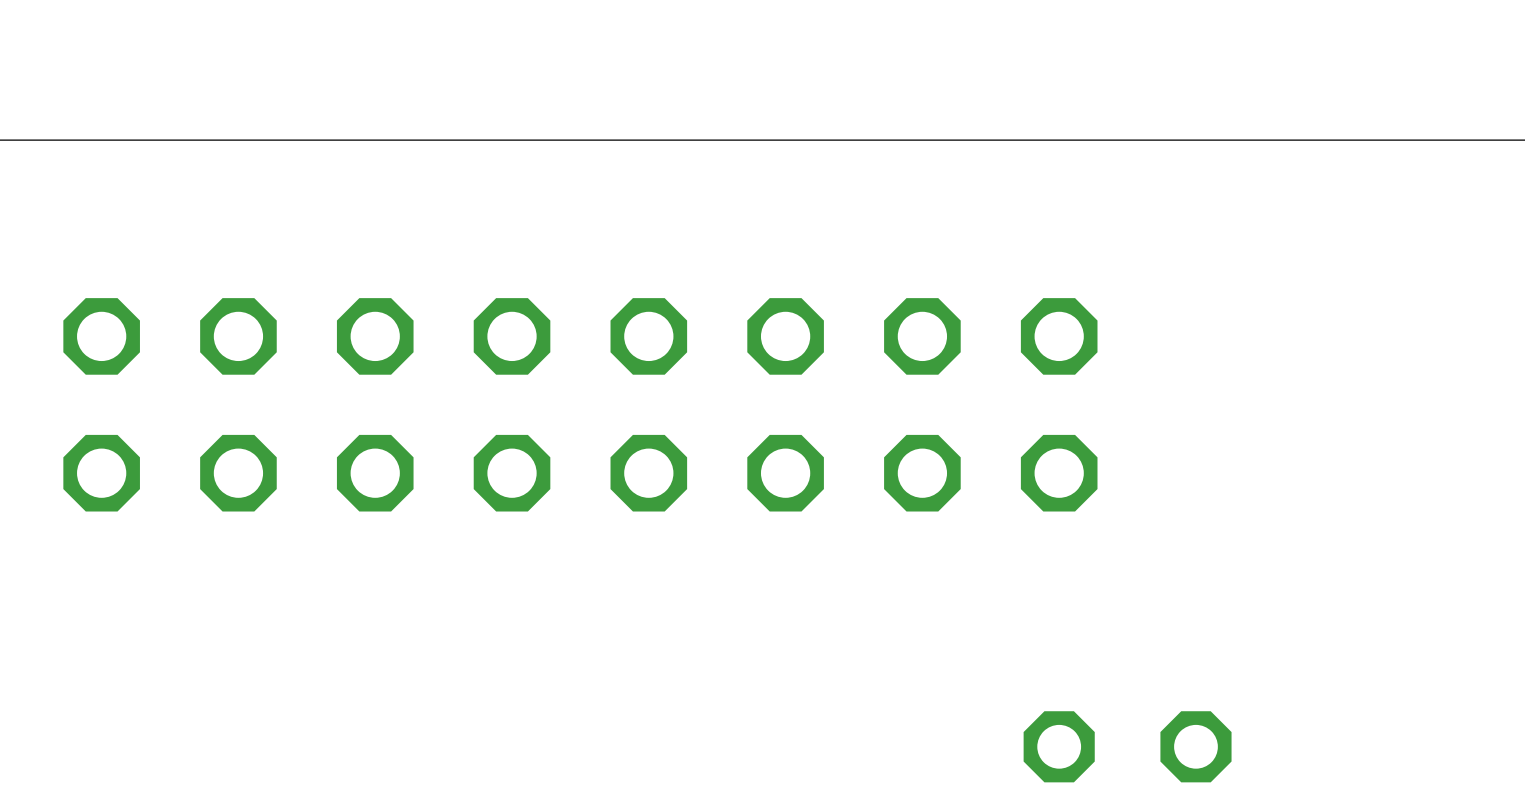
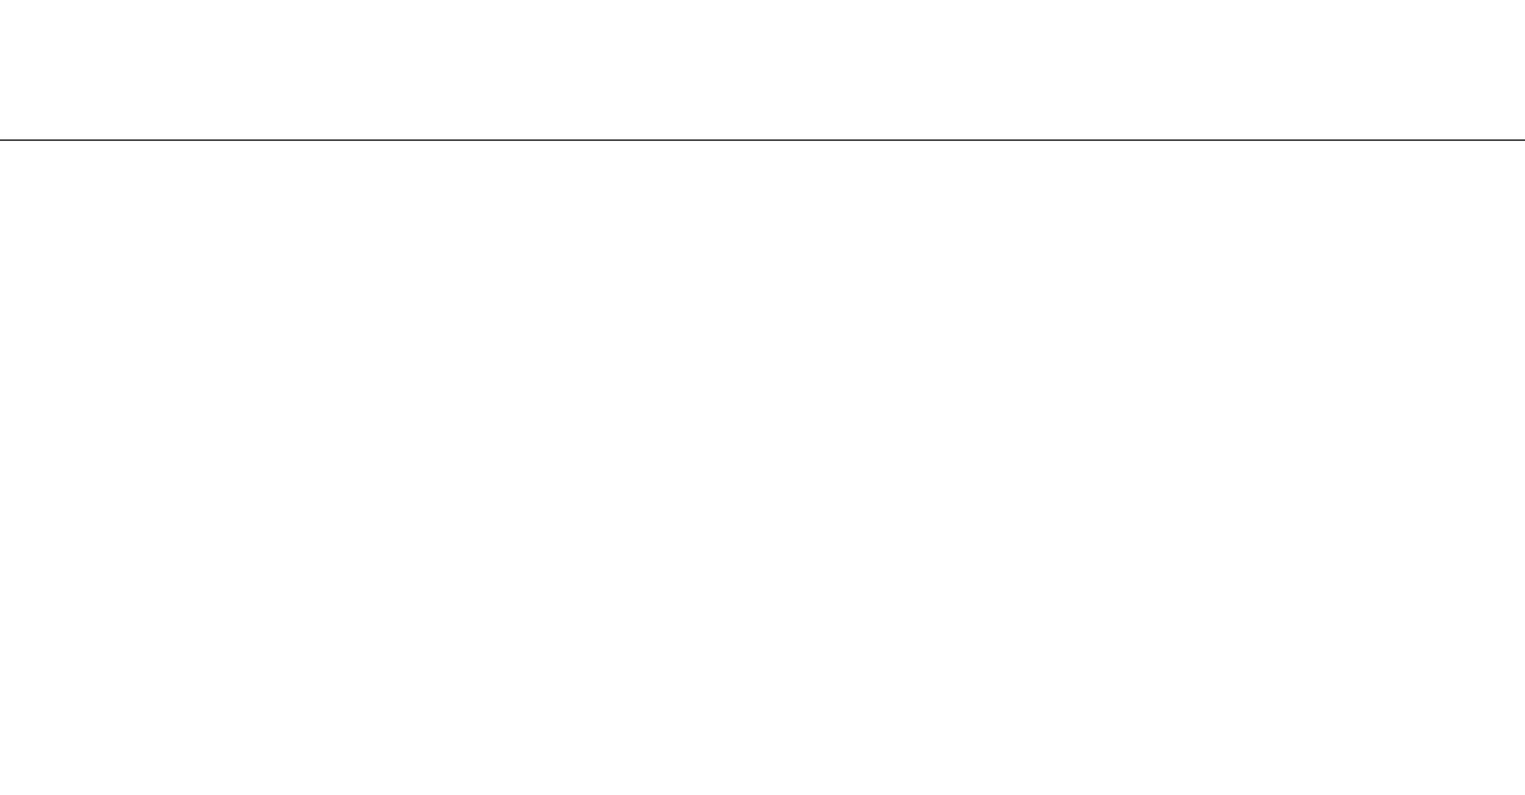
part: (580, 404) -> none
part: (1127, 746) -> none

